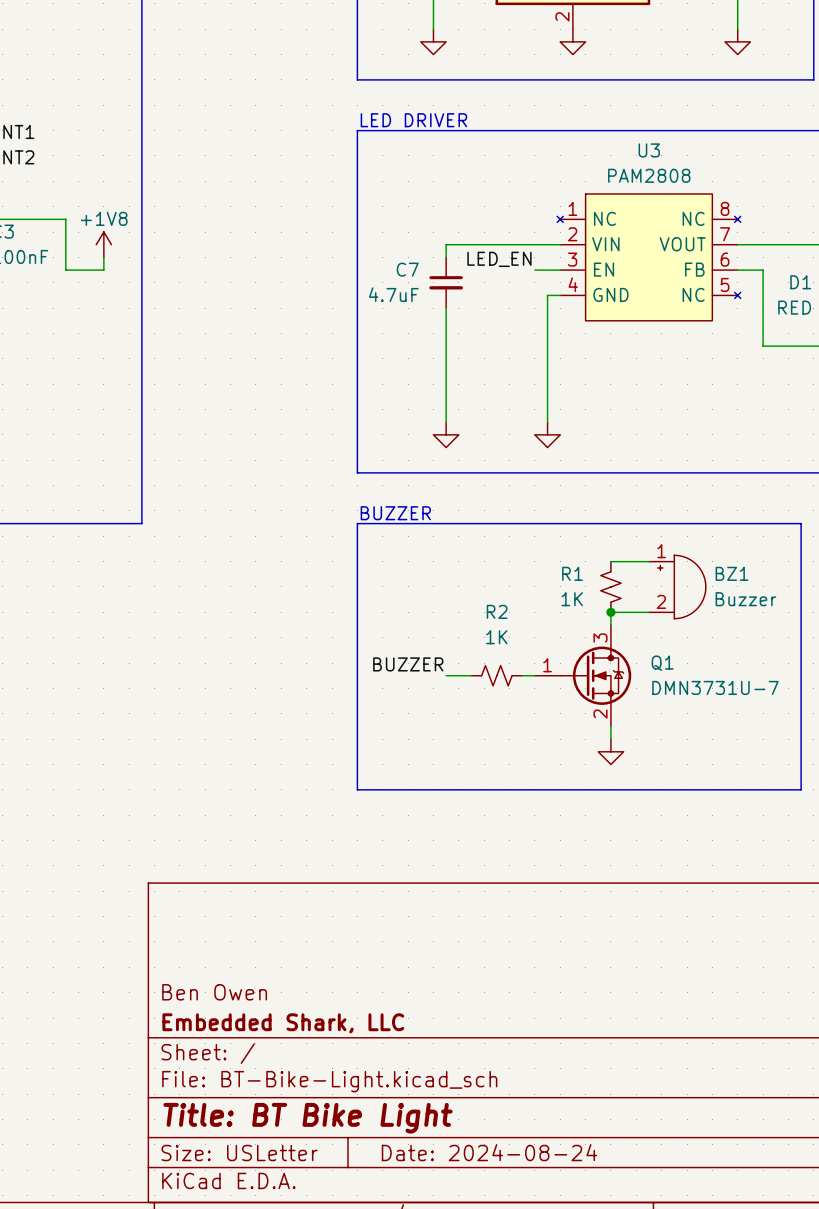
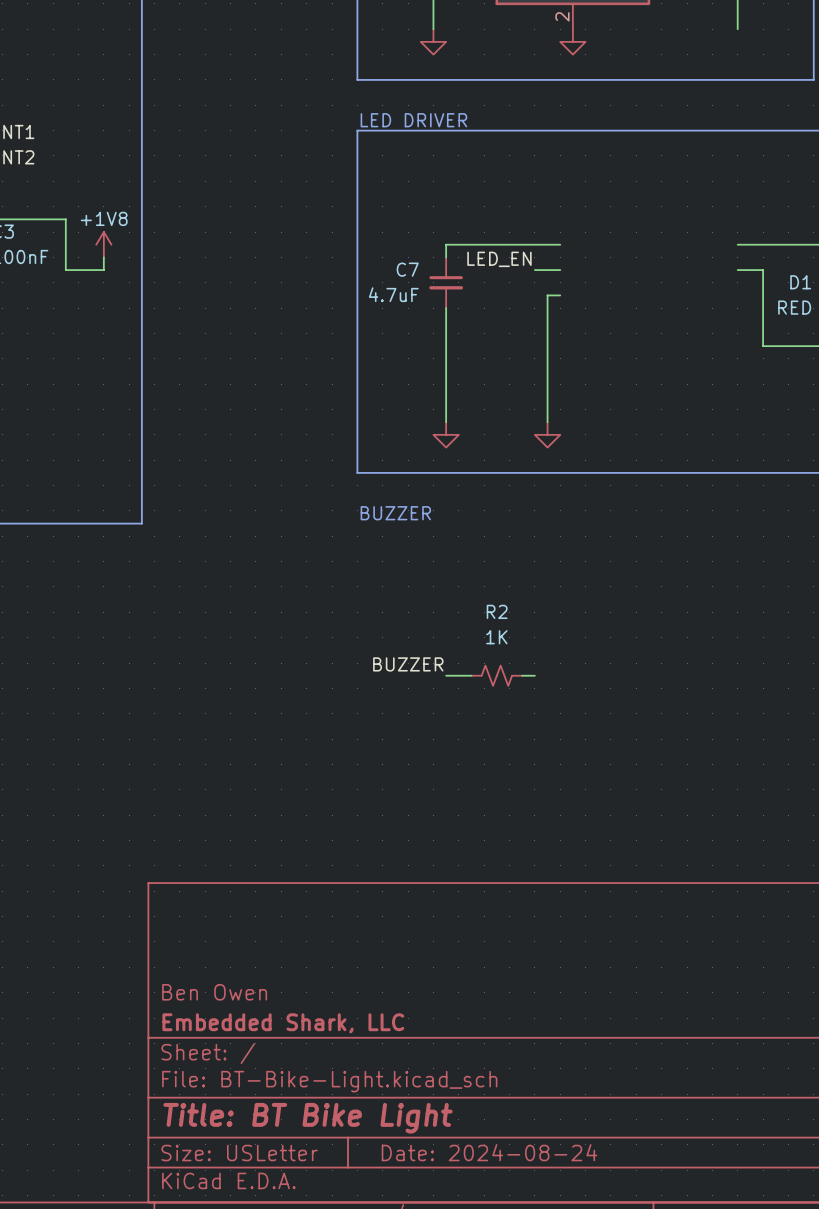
power symbol: (737, 41) -> none
U3: PAM2808 (648, 257) -> none
line: (357, 523) (357, 789) (801, 789) (801, 523) (357, 523) -> none
wire: (610, 561) (648, 561) -> none
R1: 1K (610, 586) -> none
BZ1: Buzzer (677, 586) -> none
junction: (610, 612) -> none
wire: (648, 612) (610, 612) (610, 625) -> none
Q1: DMN3731U-7 (583, 675) -> none
wire: (610, 726) (610, 739) -> none
power symbol: (610, 751) -> none

